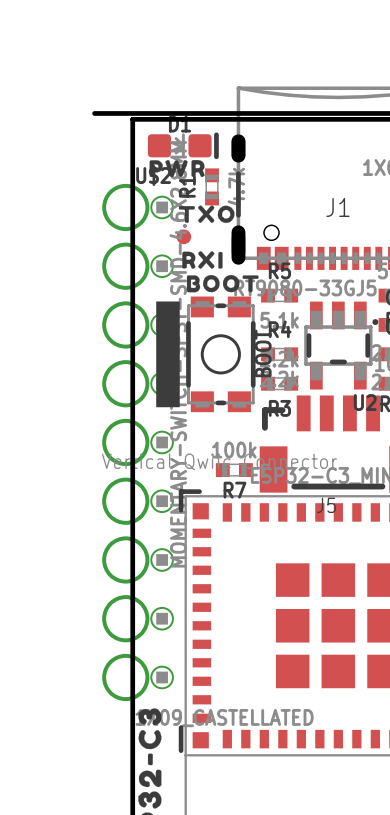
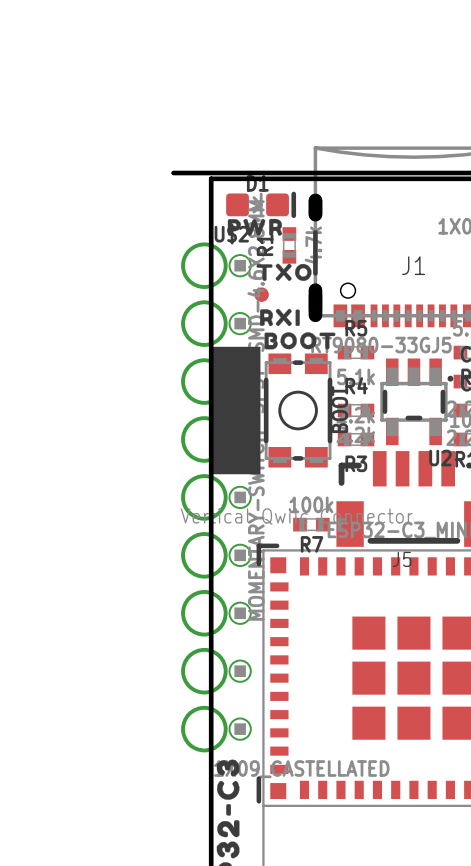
drawing shape: [156, 301, 180, 408] -> [211, 346, 261, 475]

